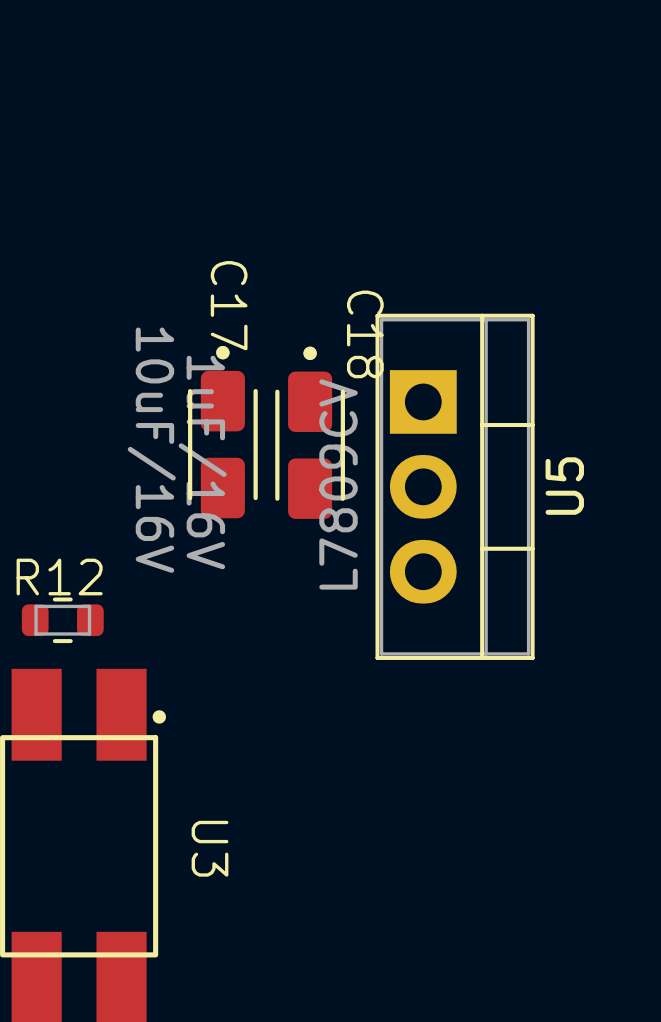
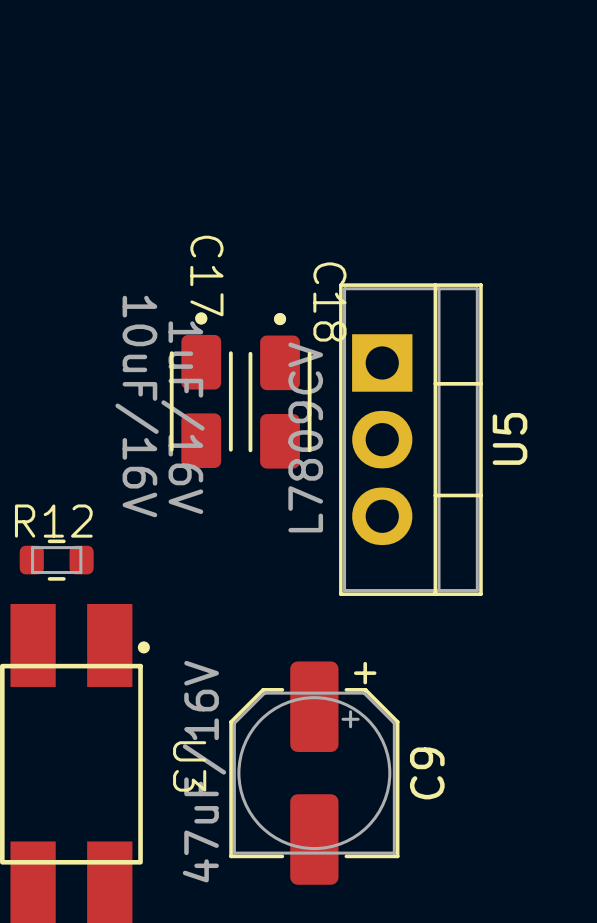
C9: none -> 47uF/16V (314, 773)

